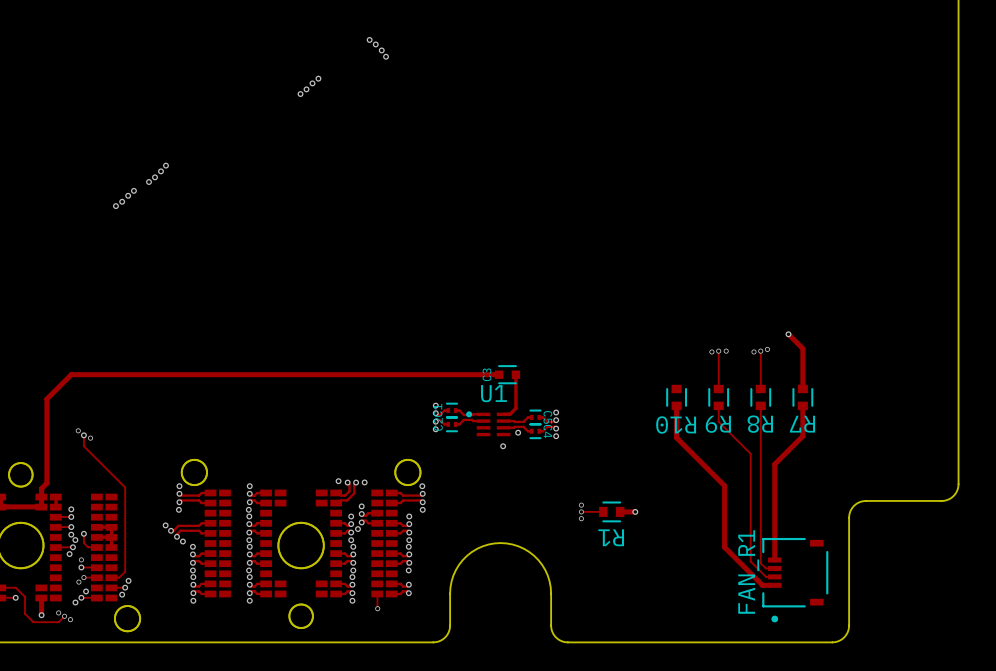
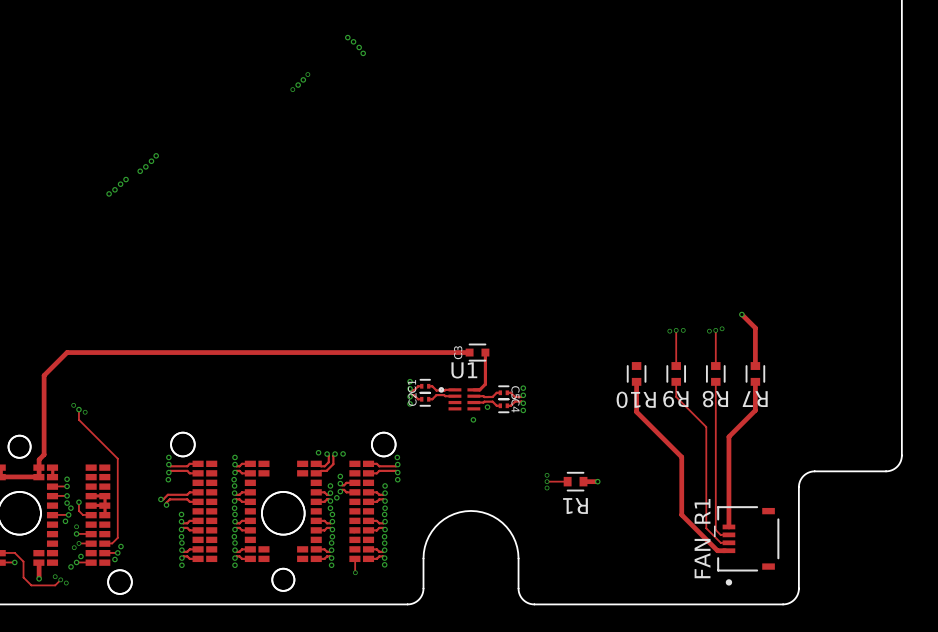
via: (318, 78) -> none
via: none -> (307, 74)
via: (312, 83) -> none
via: none -> (303, 79)
via: (306, 89) -> none
via: none -> (298, 85)
via: (300, 94) -> none
via: none -> (292, 89)
via: (165, 525) -> none
via: (182, 541) -> none
via: none -> (384, 543)
via: none -> (384, 564)

